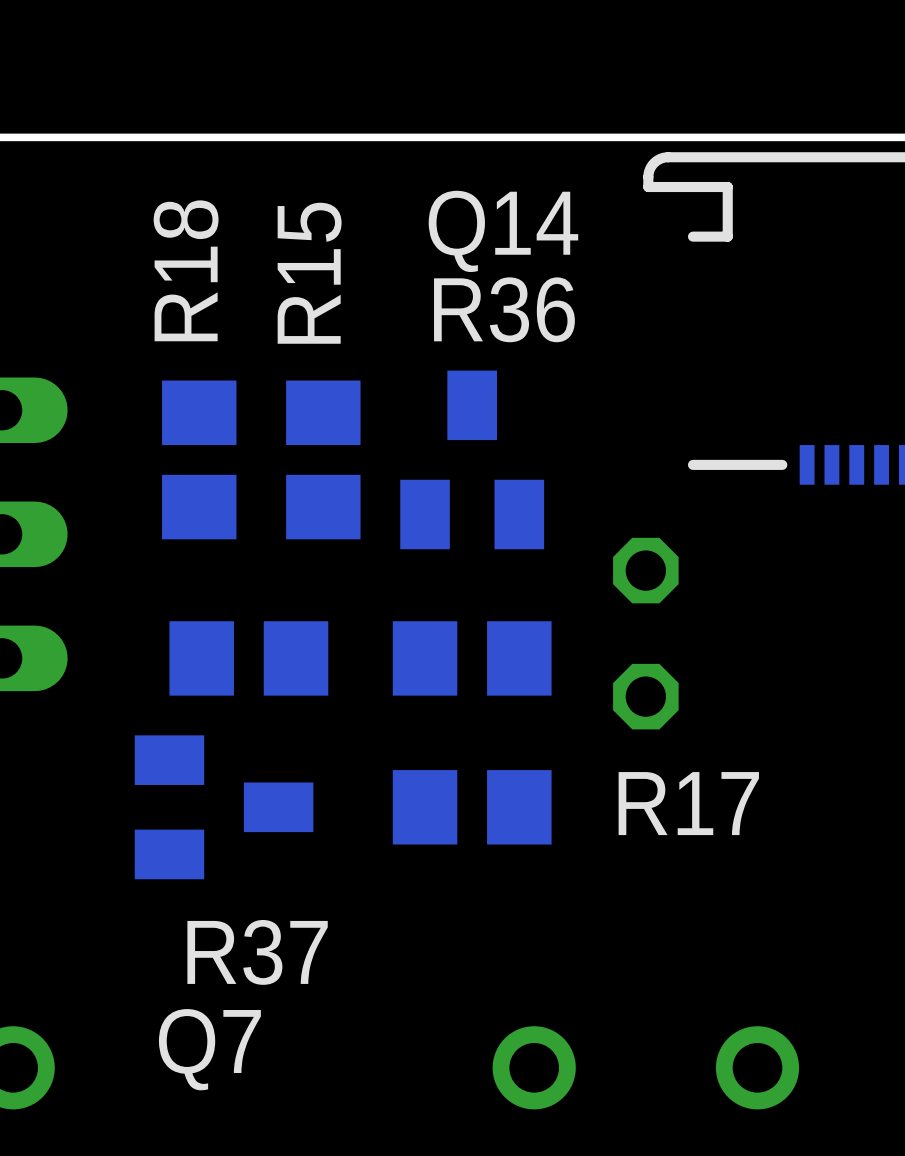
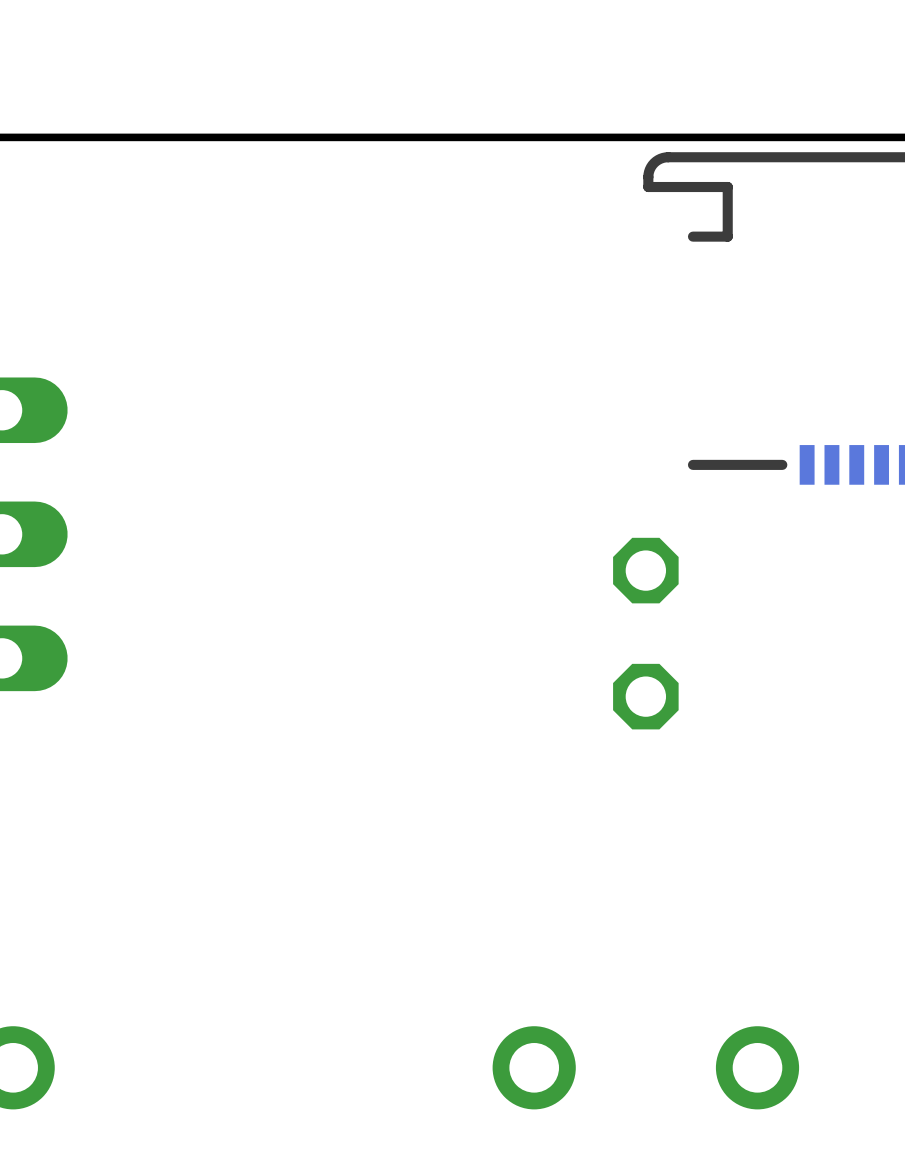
R18: (199, 459) -> none
R15: (323, 459) -> none
Q14: (472, 459) -> none
R37: (248, 658) -> none
R36: (472, 658) -> none
Q7: (224, 807) -> none
R17: (472, 807) -> none

